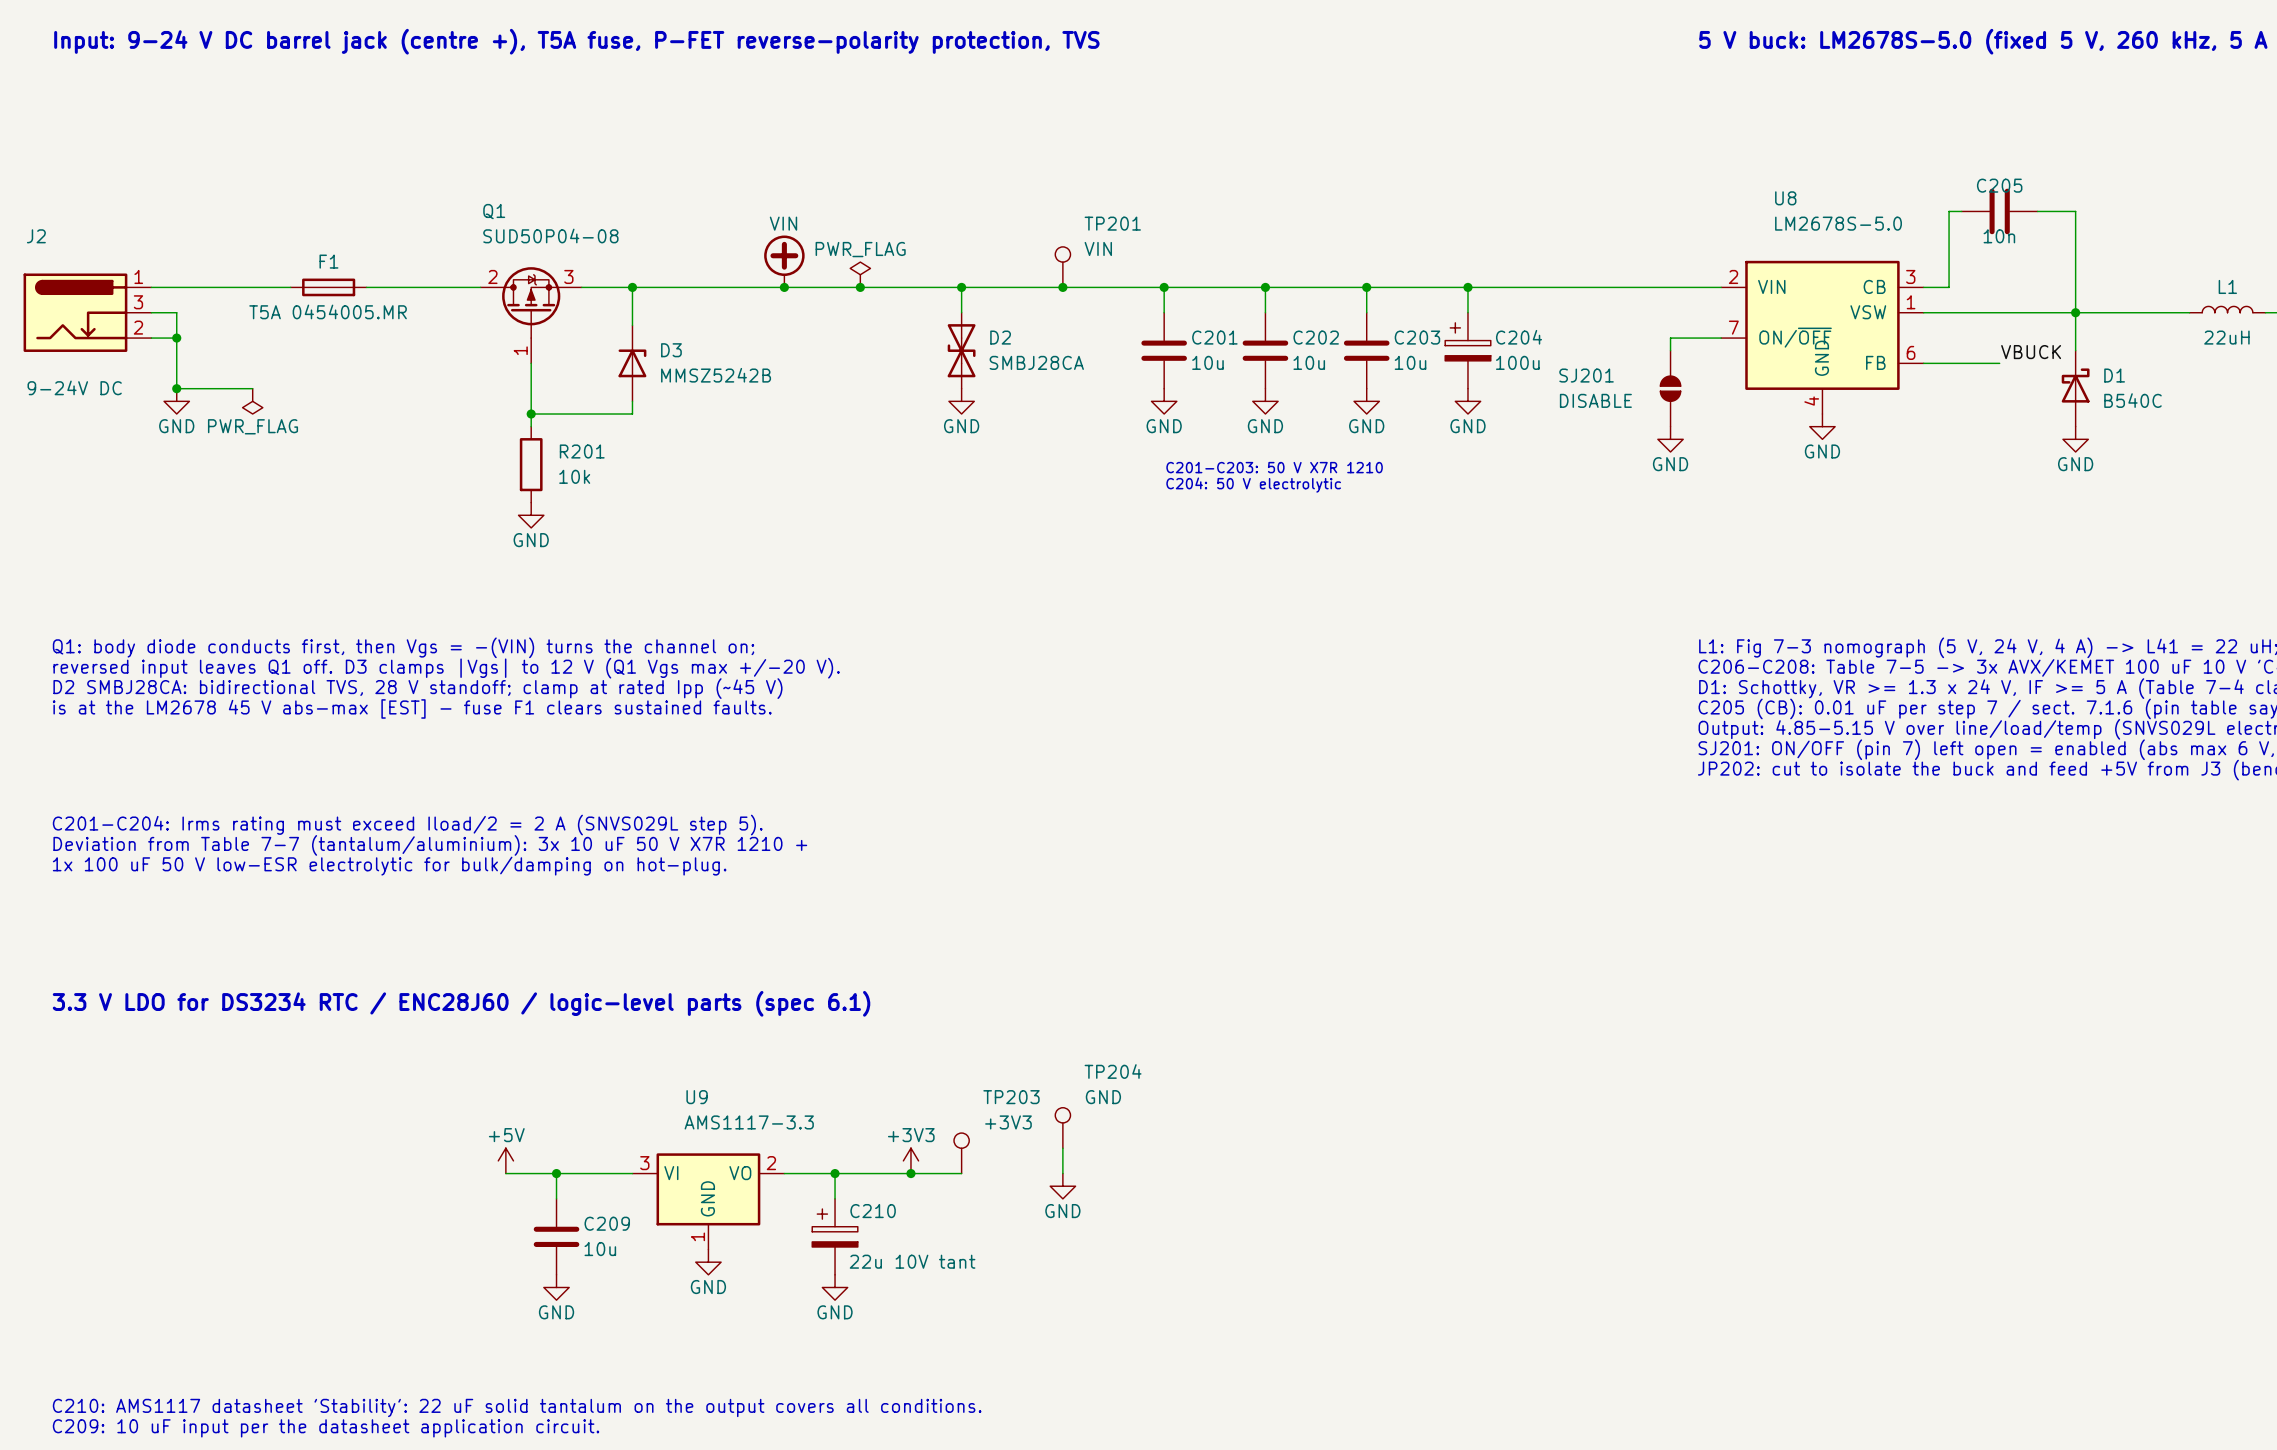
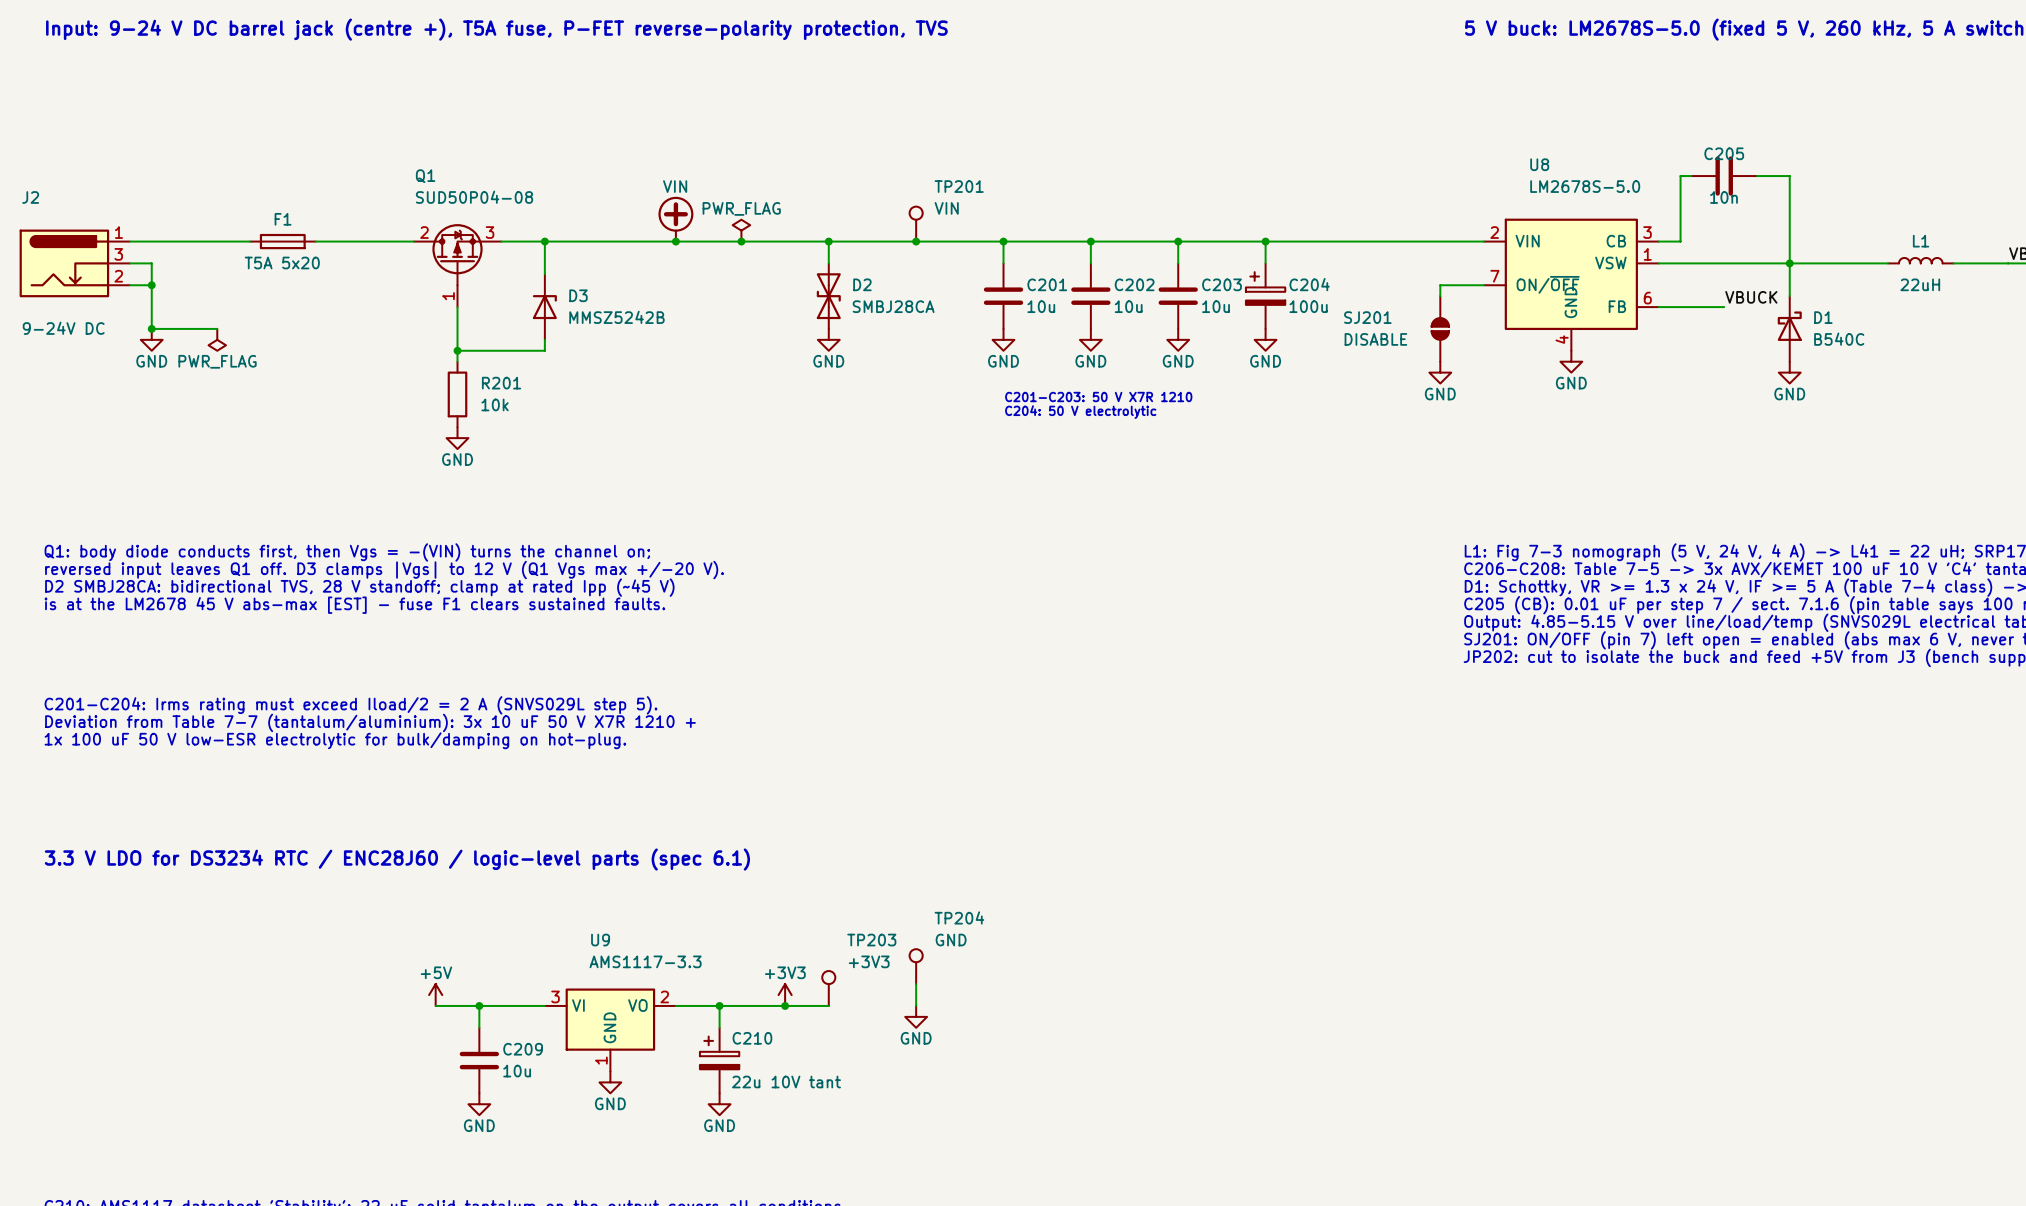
F1 value: T5A 0454005.MR (328, 311) -> T5A 5x20 (282, 263)

